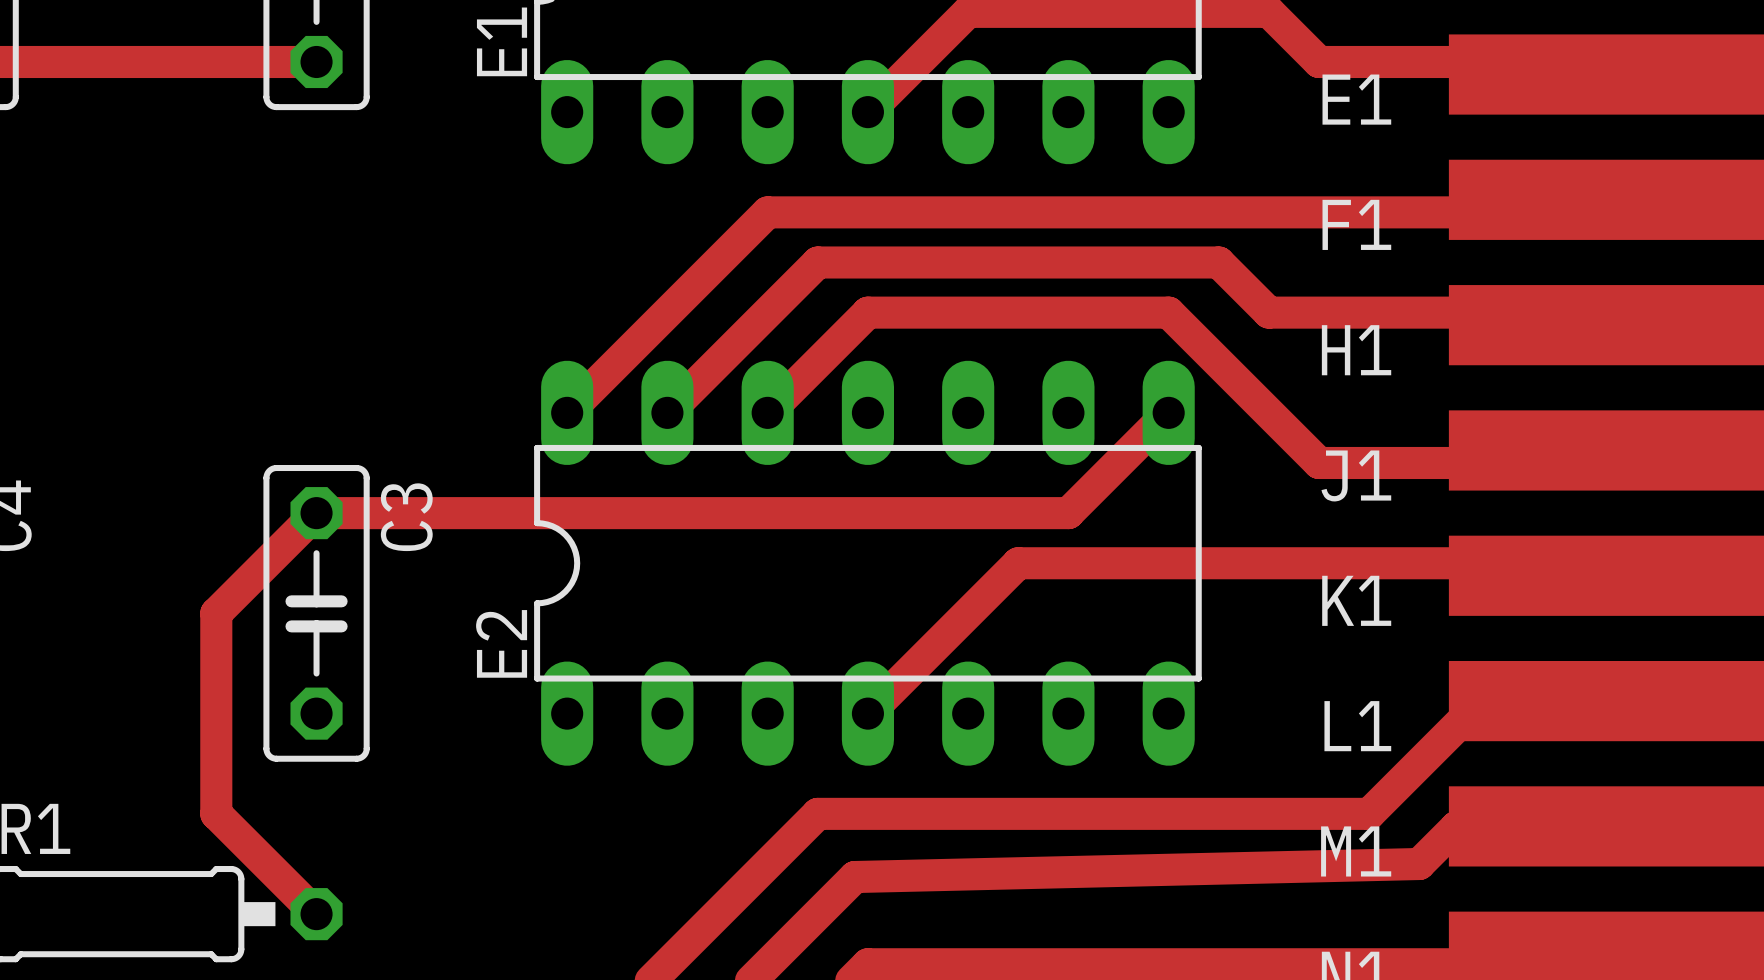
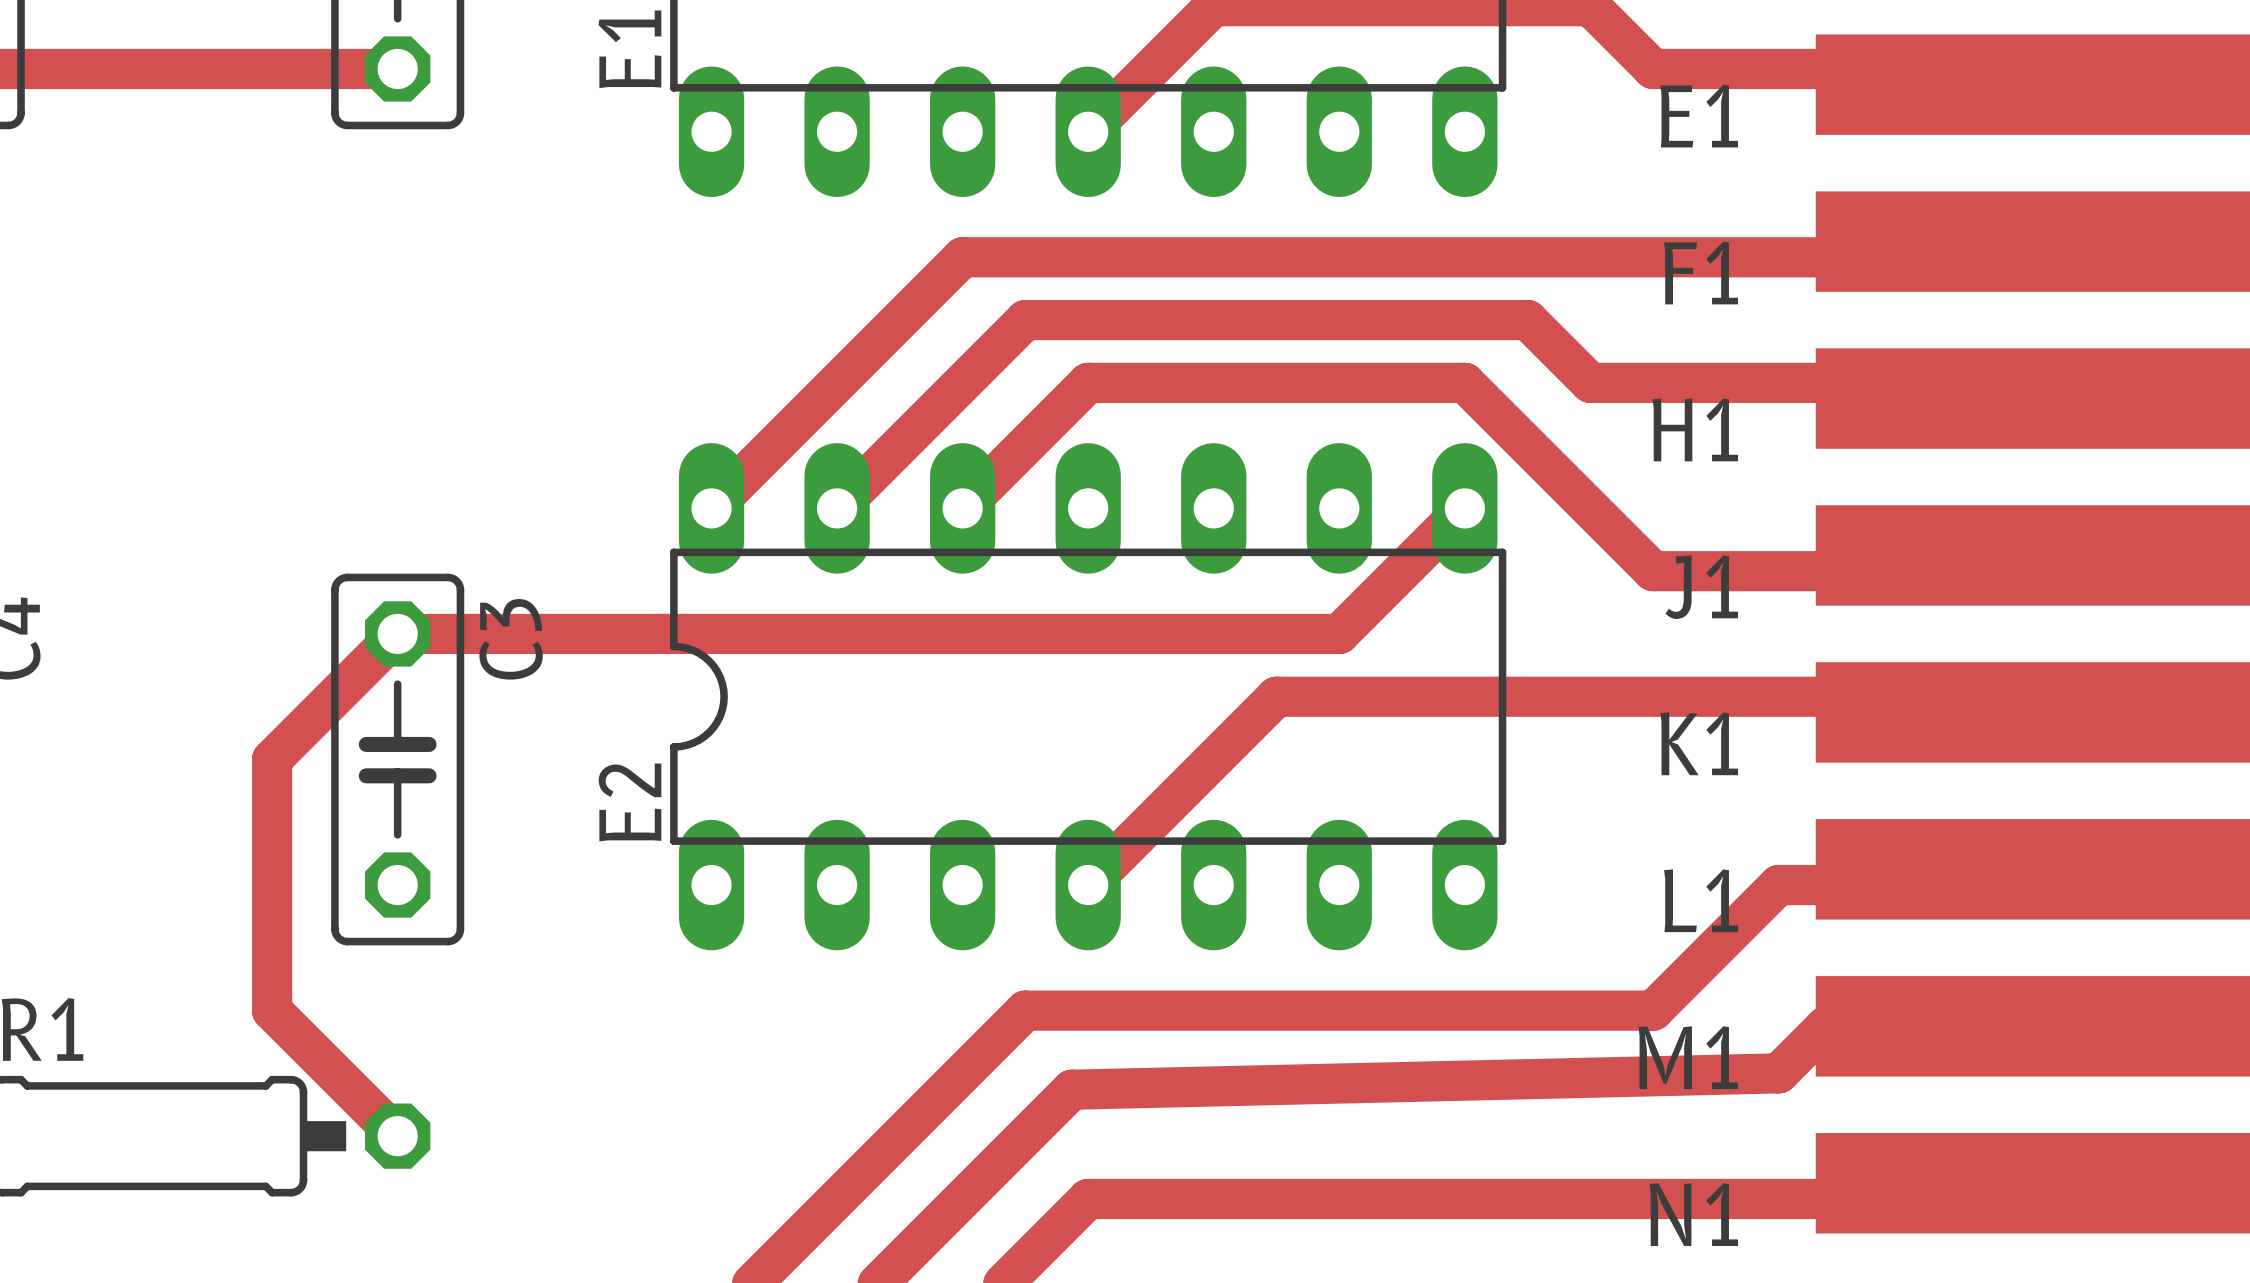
track: (1469, 713) (1369, 813) (1319, 813) -> (1841, 885) (1778, 885) (1653, 1010)

